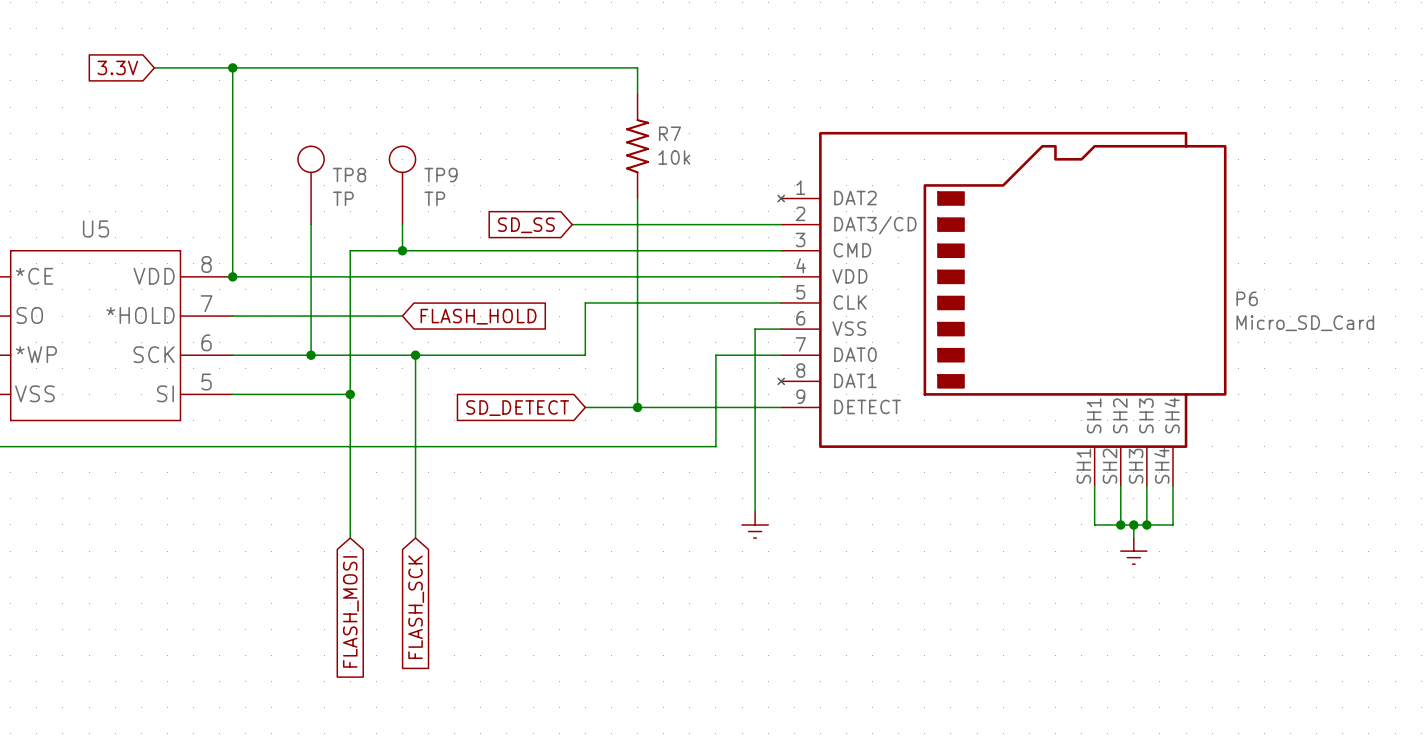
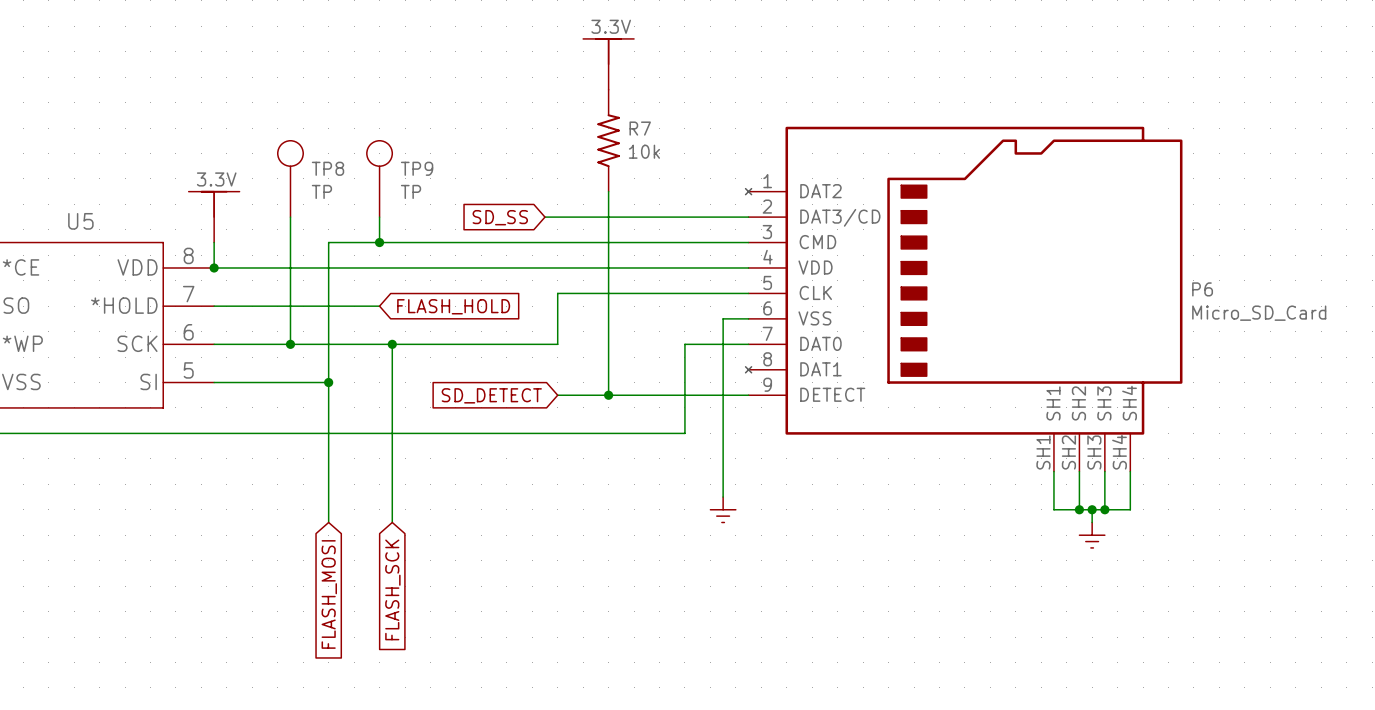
global label: 3.3V (117, 67) -> none
wire: (154, 67) (637, 67) (637, 94) -> none
wire: (232, 67) (232, 250) -> none
junction: (232, 67) -> none
power symbol: none -> 3.3V (608, 64)
power symbol: none -> 3.3V (214, 217)

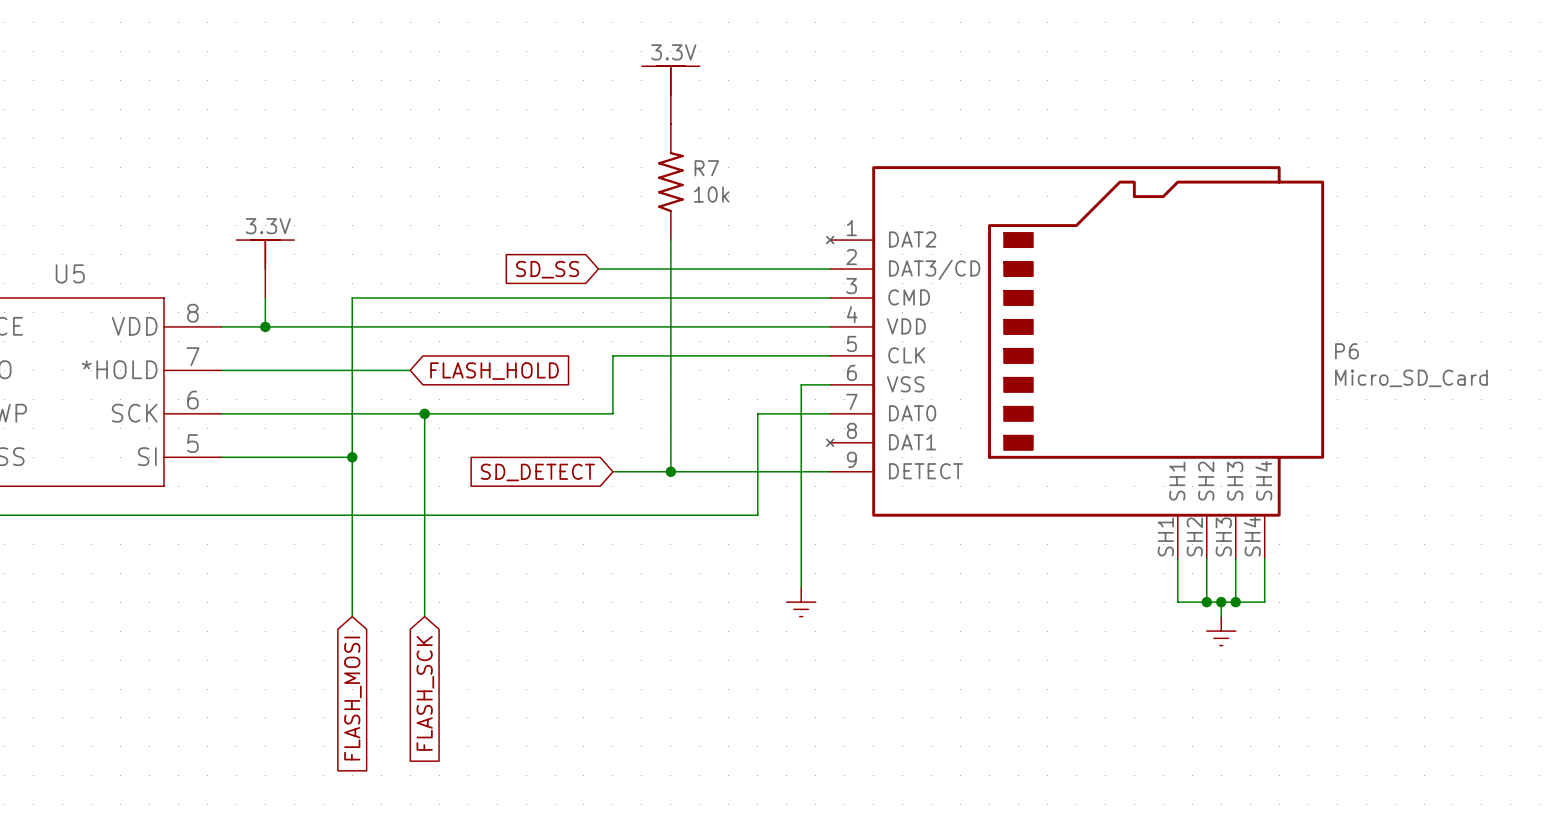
TP8: TP (290, 178) -> none
TP9: TP (379, 178) -> none
power symbol position: 3.3V (214, 217) -> 3.3V (265, 269)
wire: (290, 217) (290, 344) -> none
wire: (379, 217) (379, 242) -> none
wire: (214, 242) (214, 267) -> (265, 297) (265, 326)
junction: (379, 242) -> none
junction position: (214, 267) -> (265, 326)
junction: (290, 344) -> none

